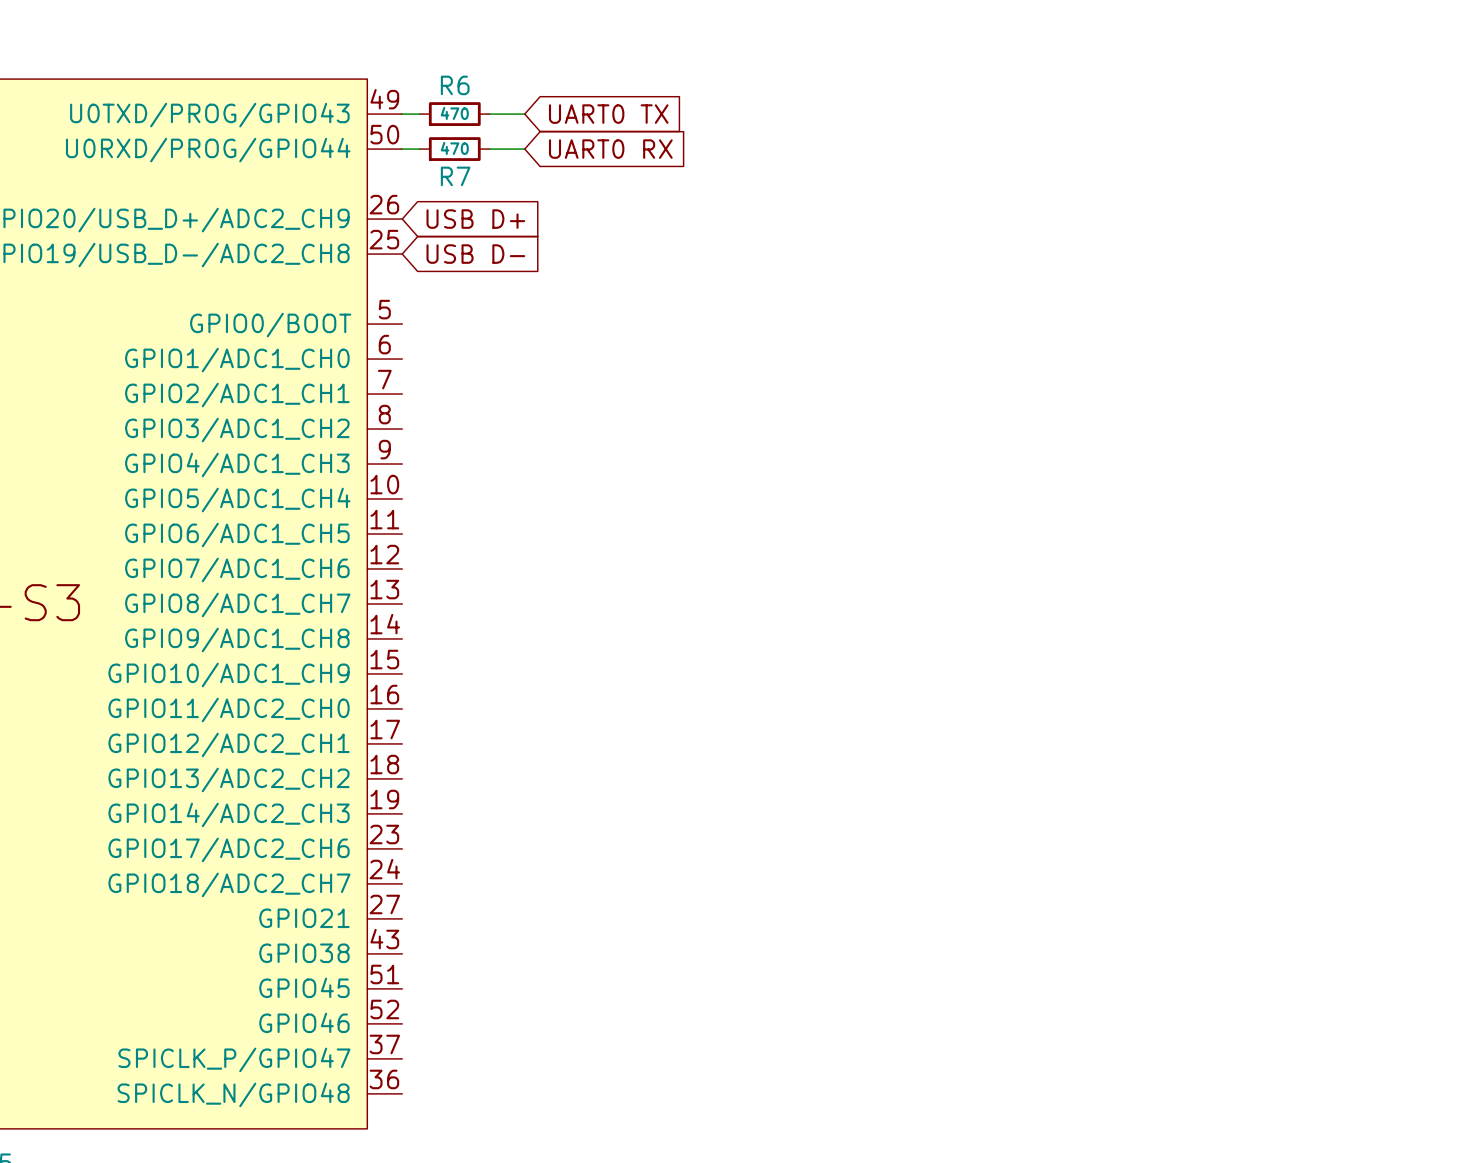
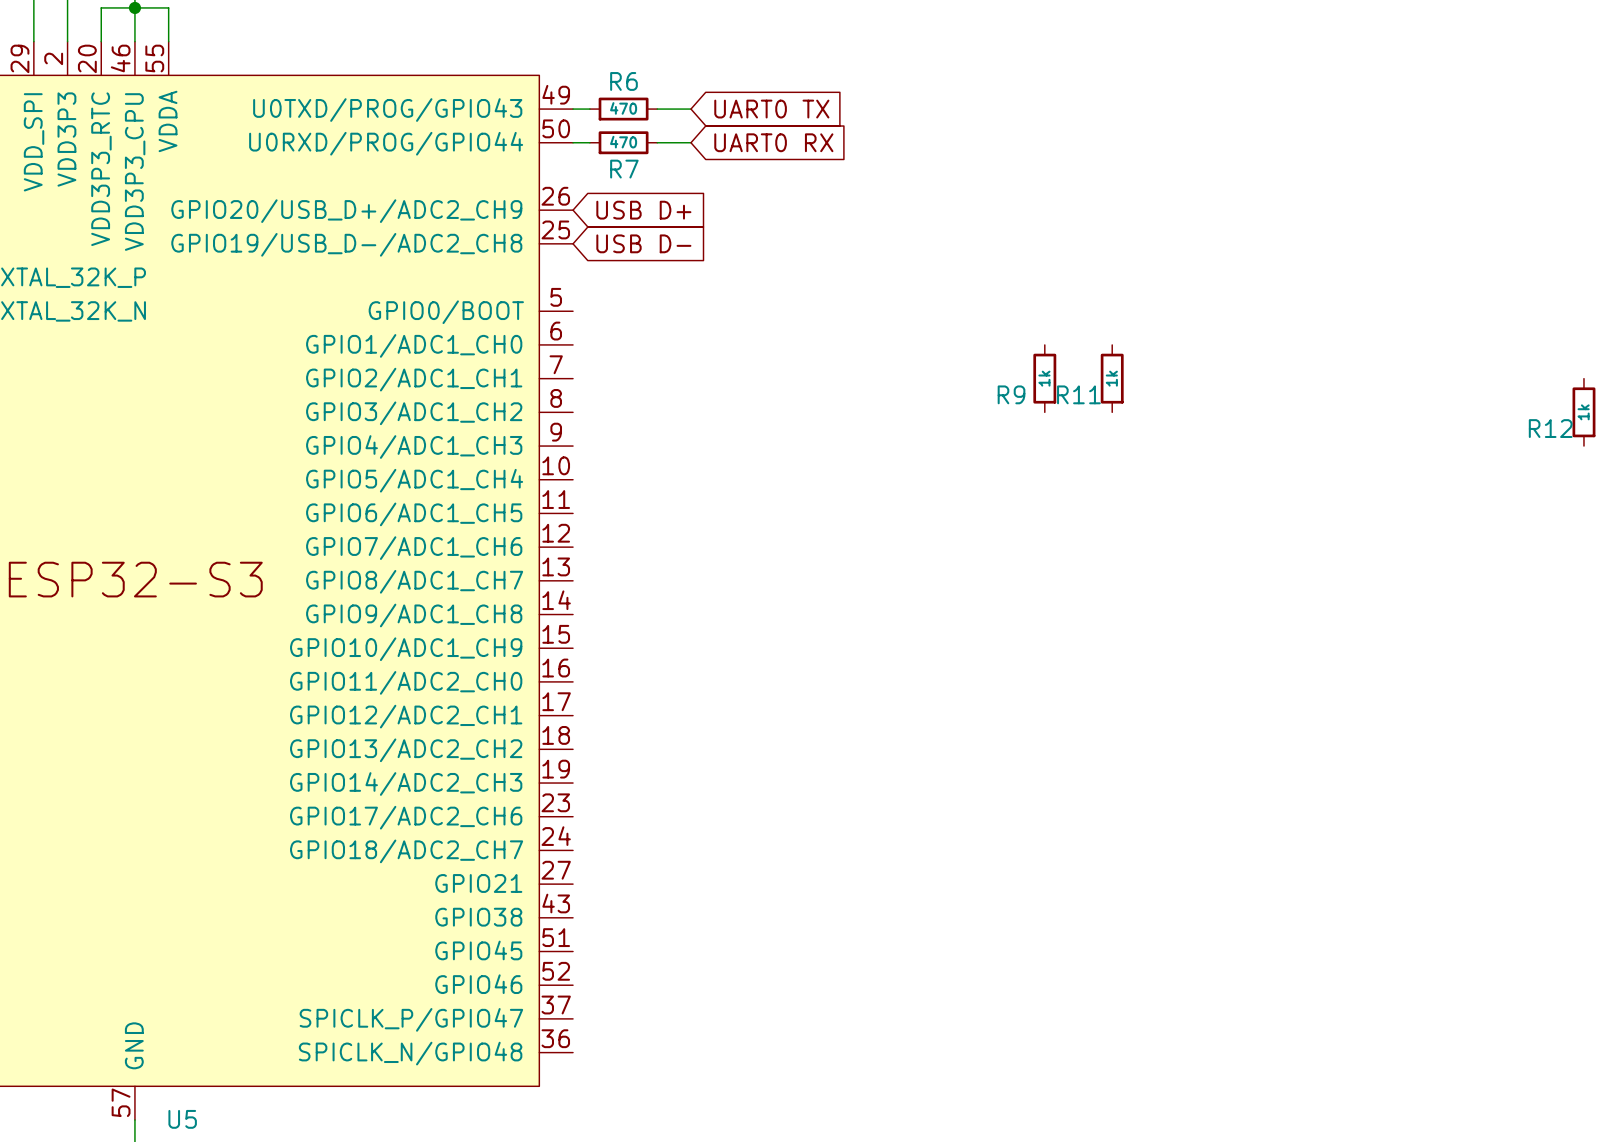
R9: none -> 1k (1044, 378)
R11: none -> 1k (1112, 378)
R12: none -> 1k (1583, 412)

